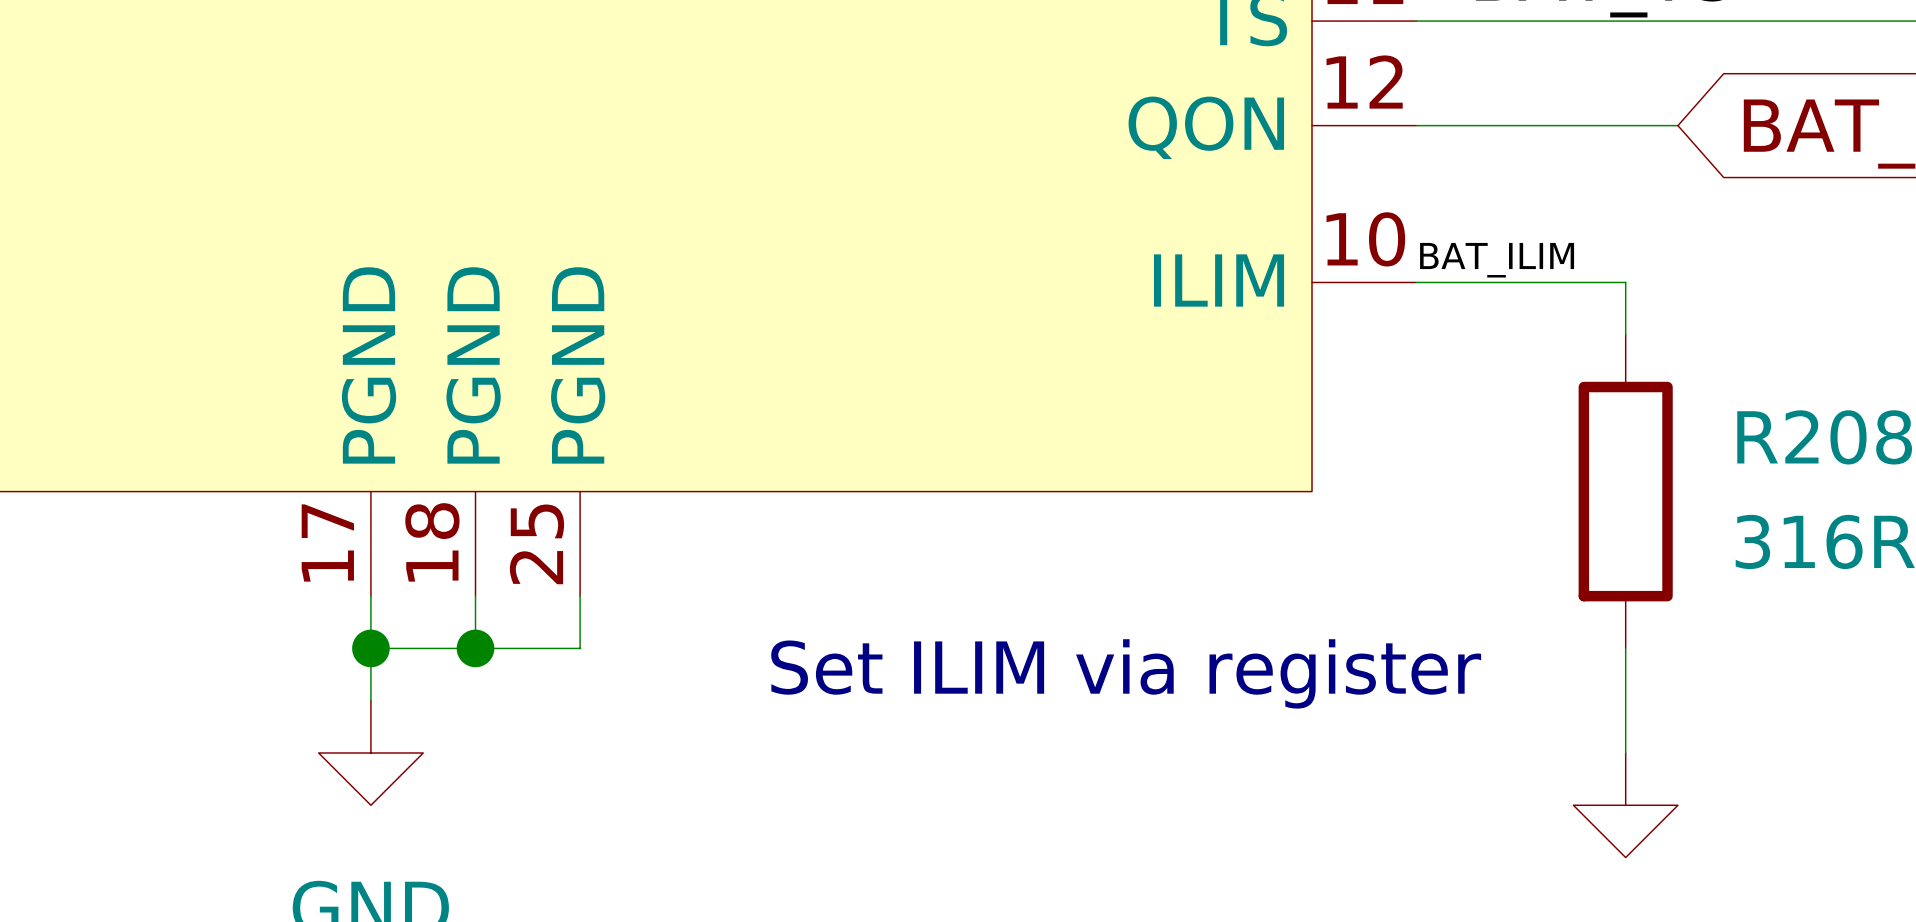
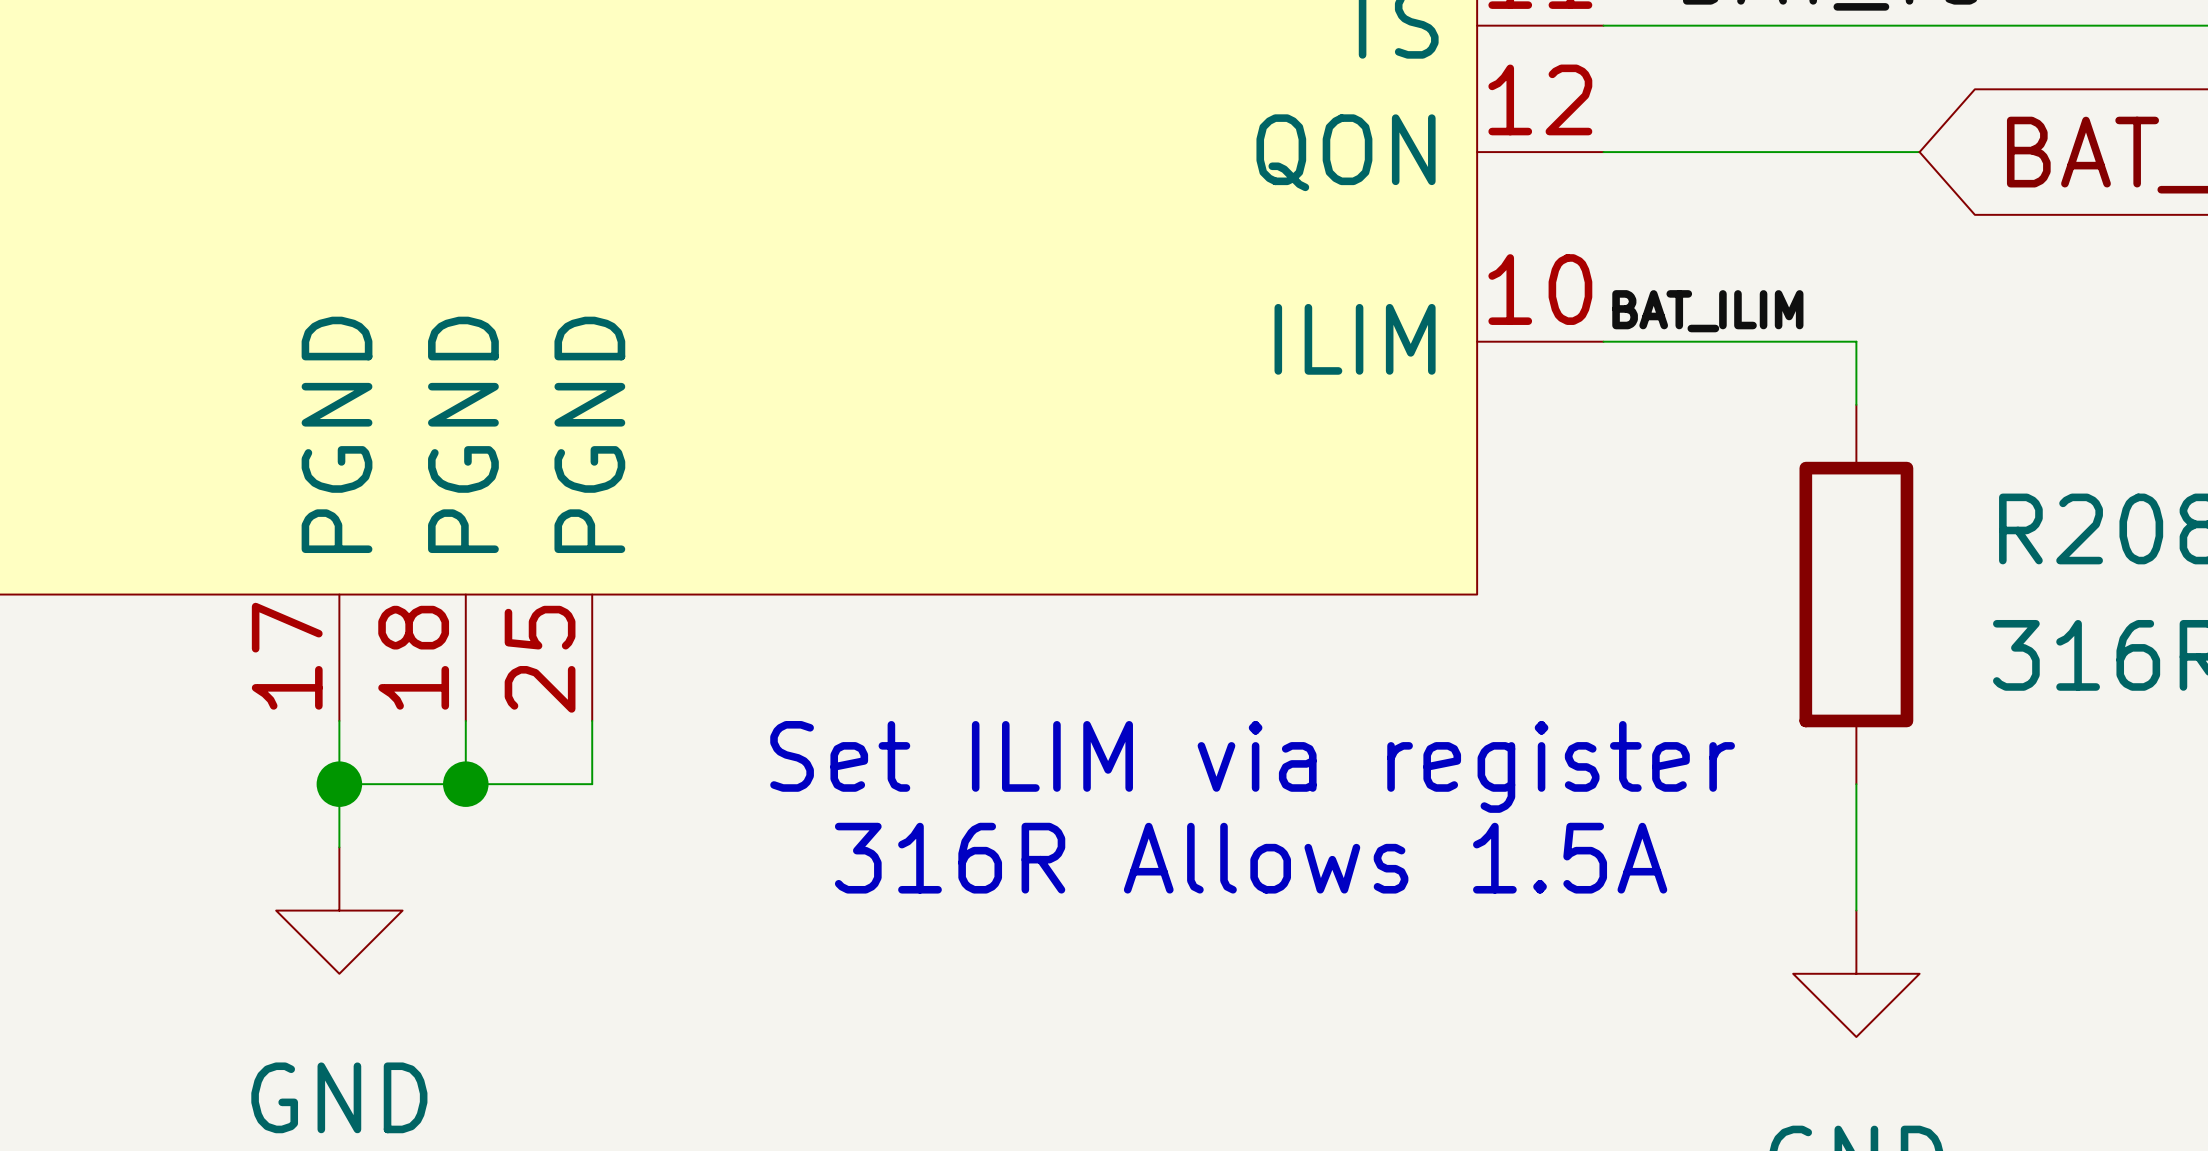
text position: Set ILIM via register (1126, 673) -> Set ILIM via register (1252, 766)
text: none -> 316R Allows 1.5A (1251, 858)

